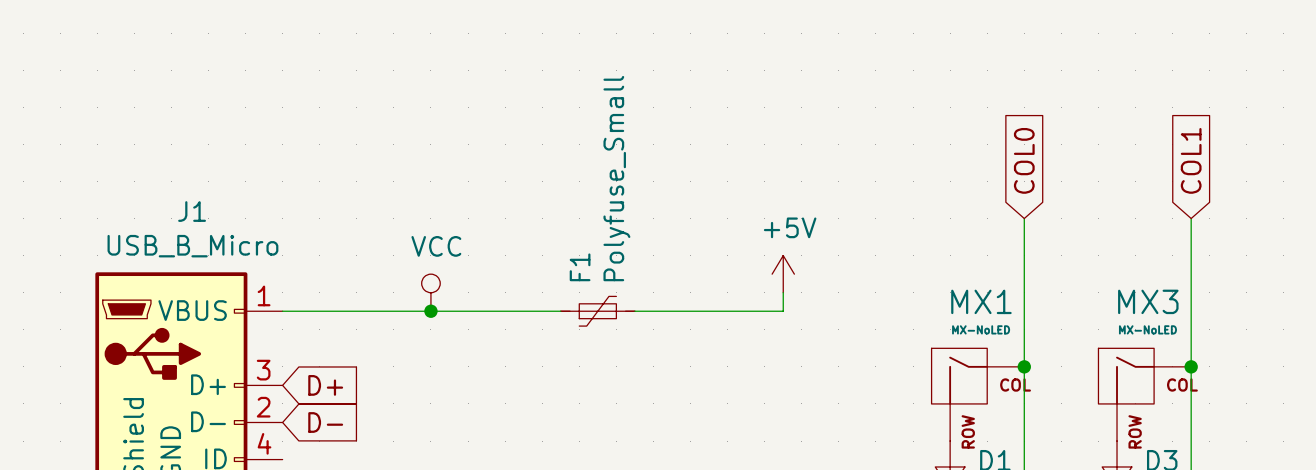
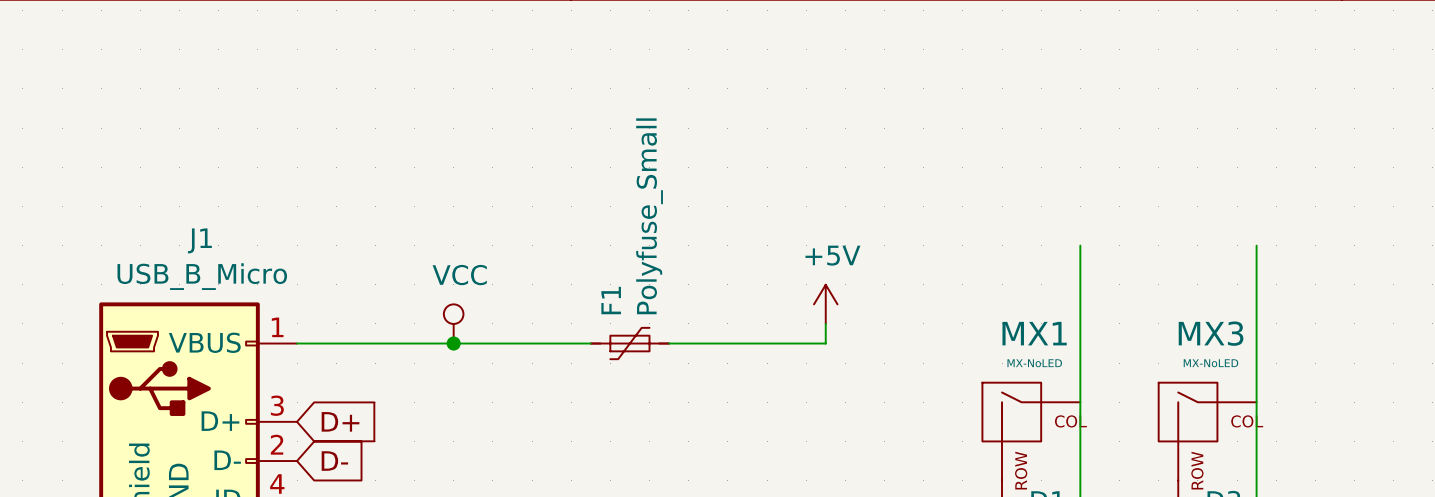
global label: COL0 (1024, 160) -> none
global label: COL1 (1191, 160) -> none
junction: (1024, 366) -> none
junction: (1191, 366) -> none

